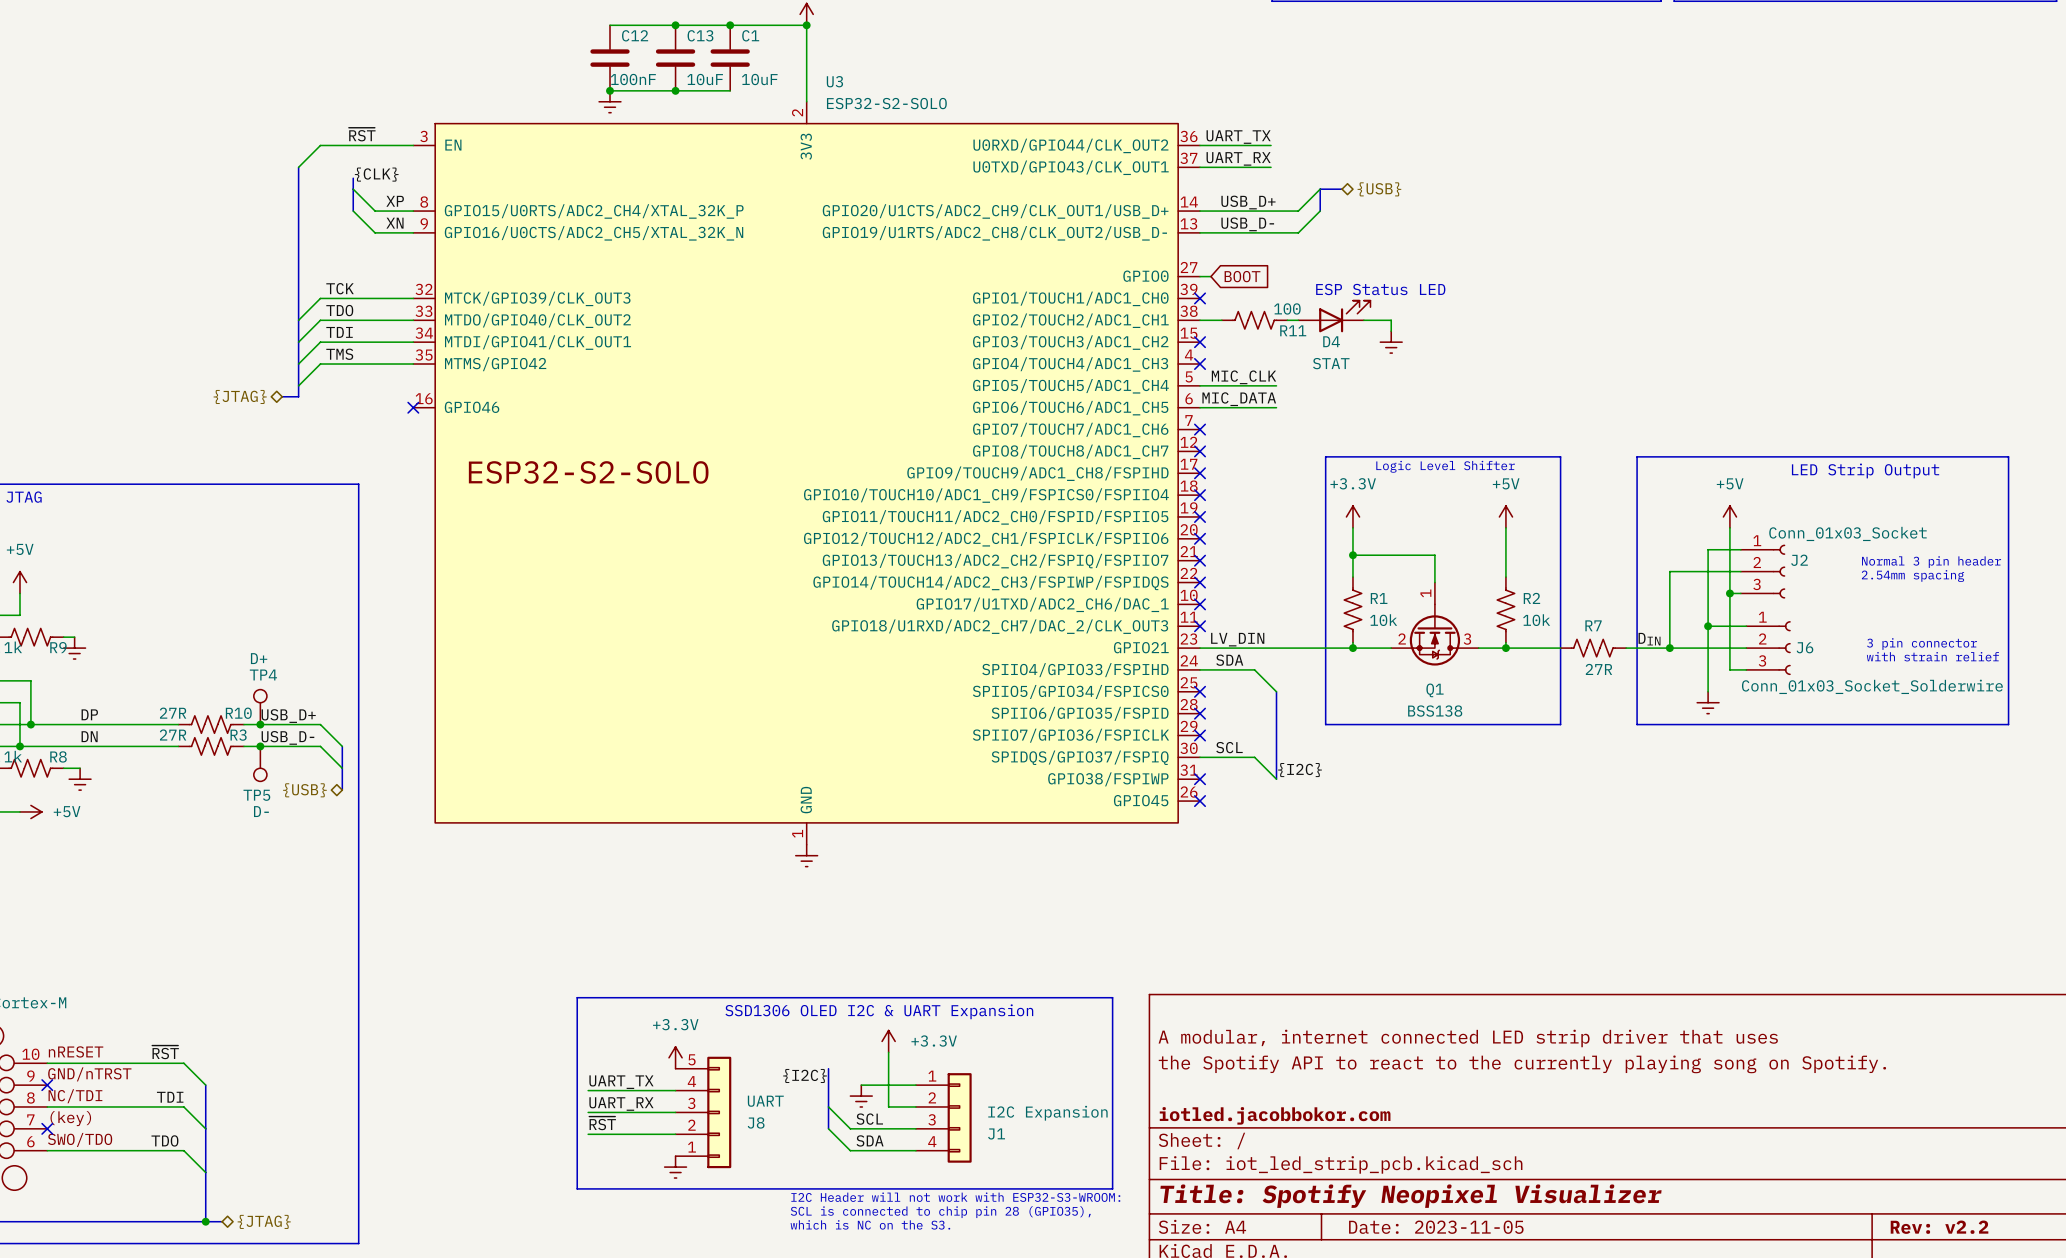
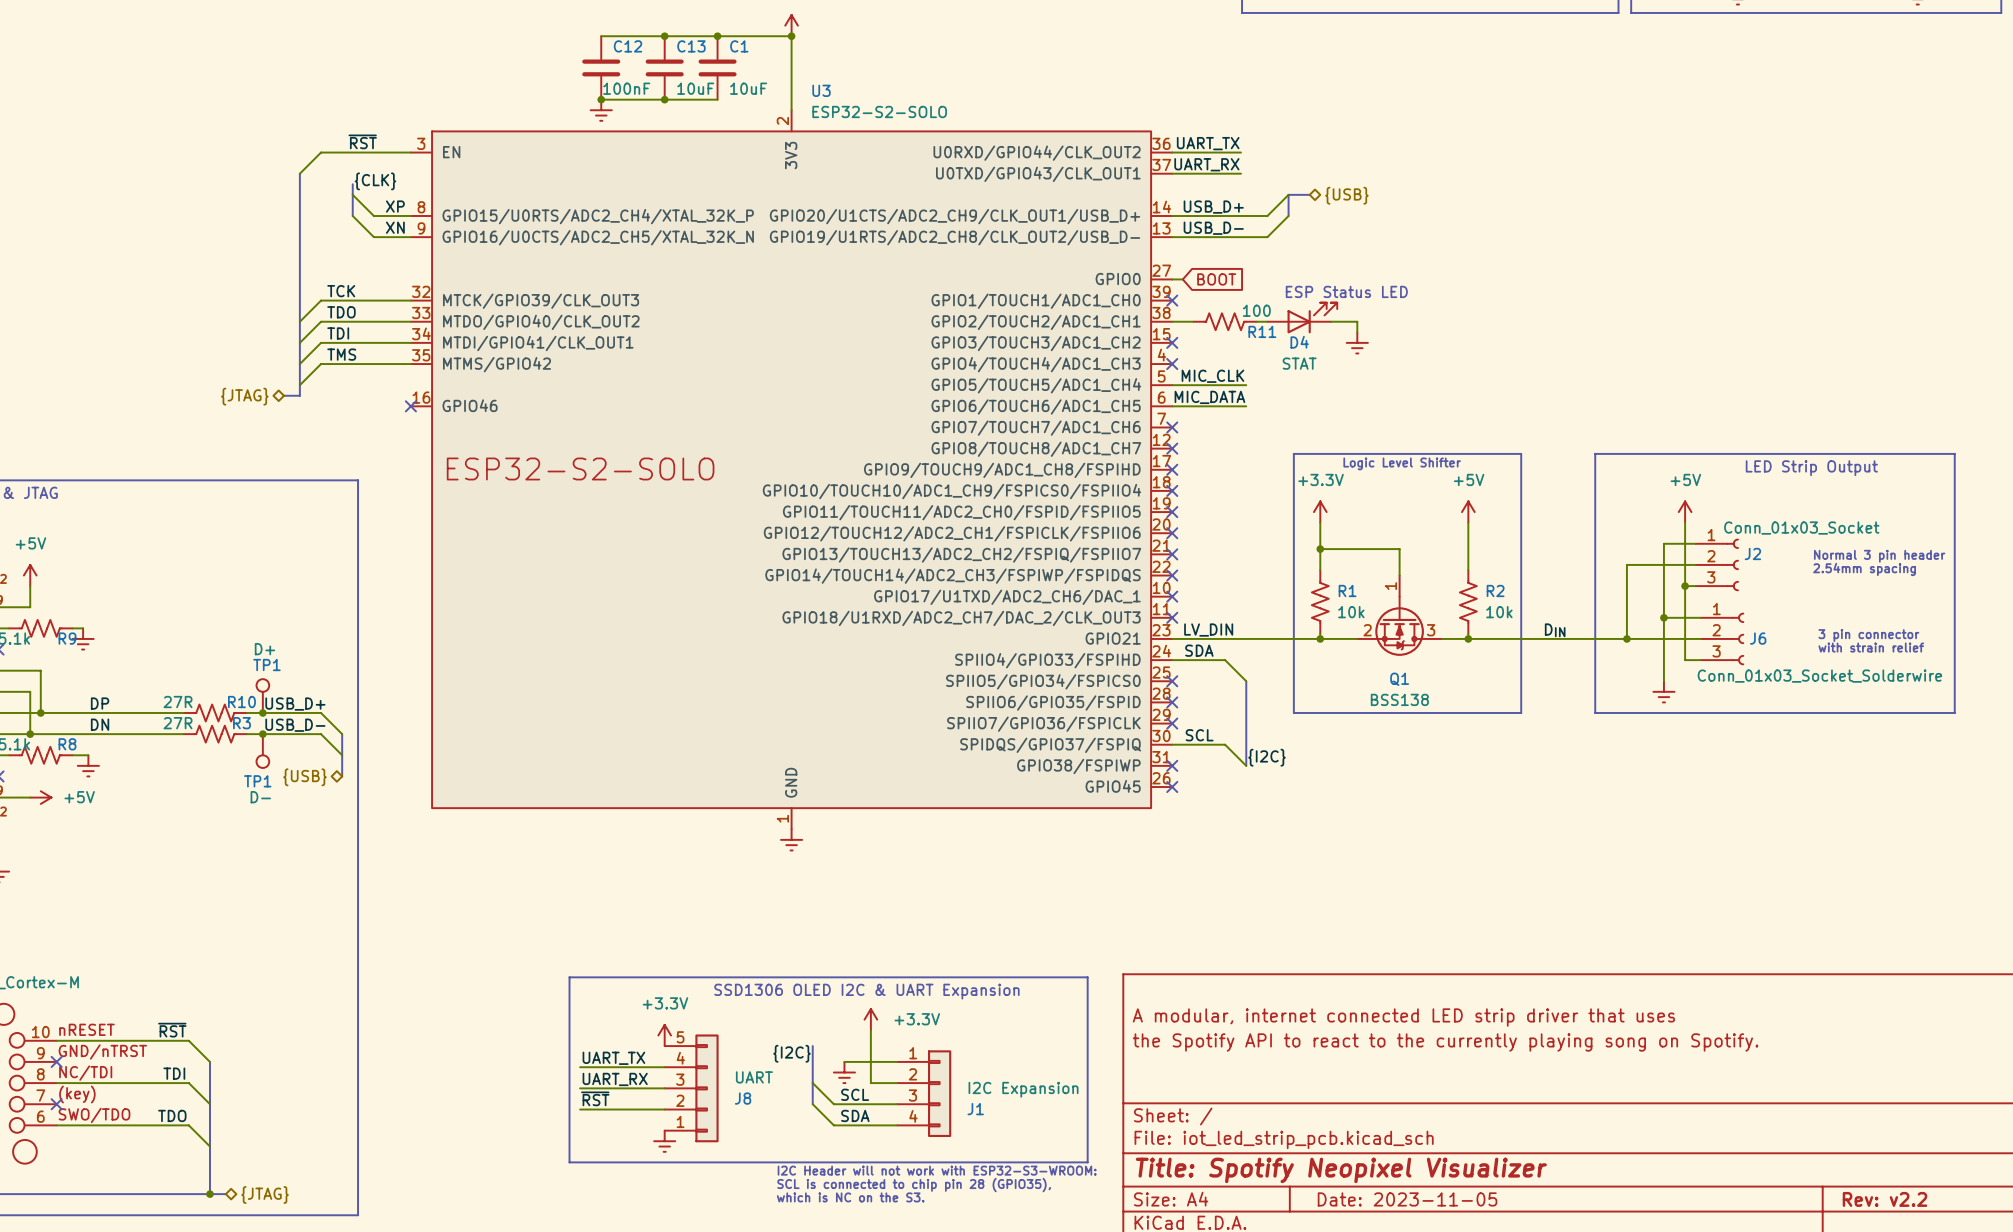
label position: DIN (1649, 639) -> DIN (1555, 630)
R7: 27R (1593, 648) -> none
TP4 name: TP4 (263, 674) -> TP1 (266, 665)
TP5 name: TP5 (256, 795) -> TP1 (257, 781)
title block: iotled.jacobbokor.com (1275, 1115) -> none

